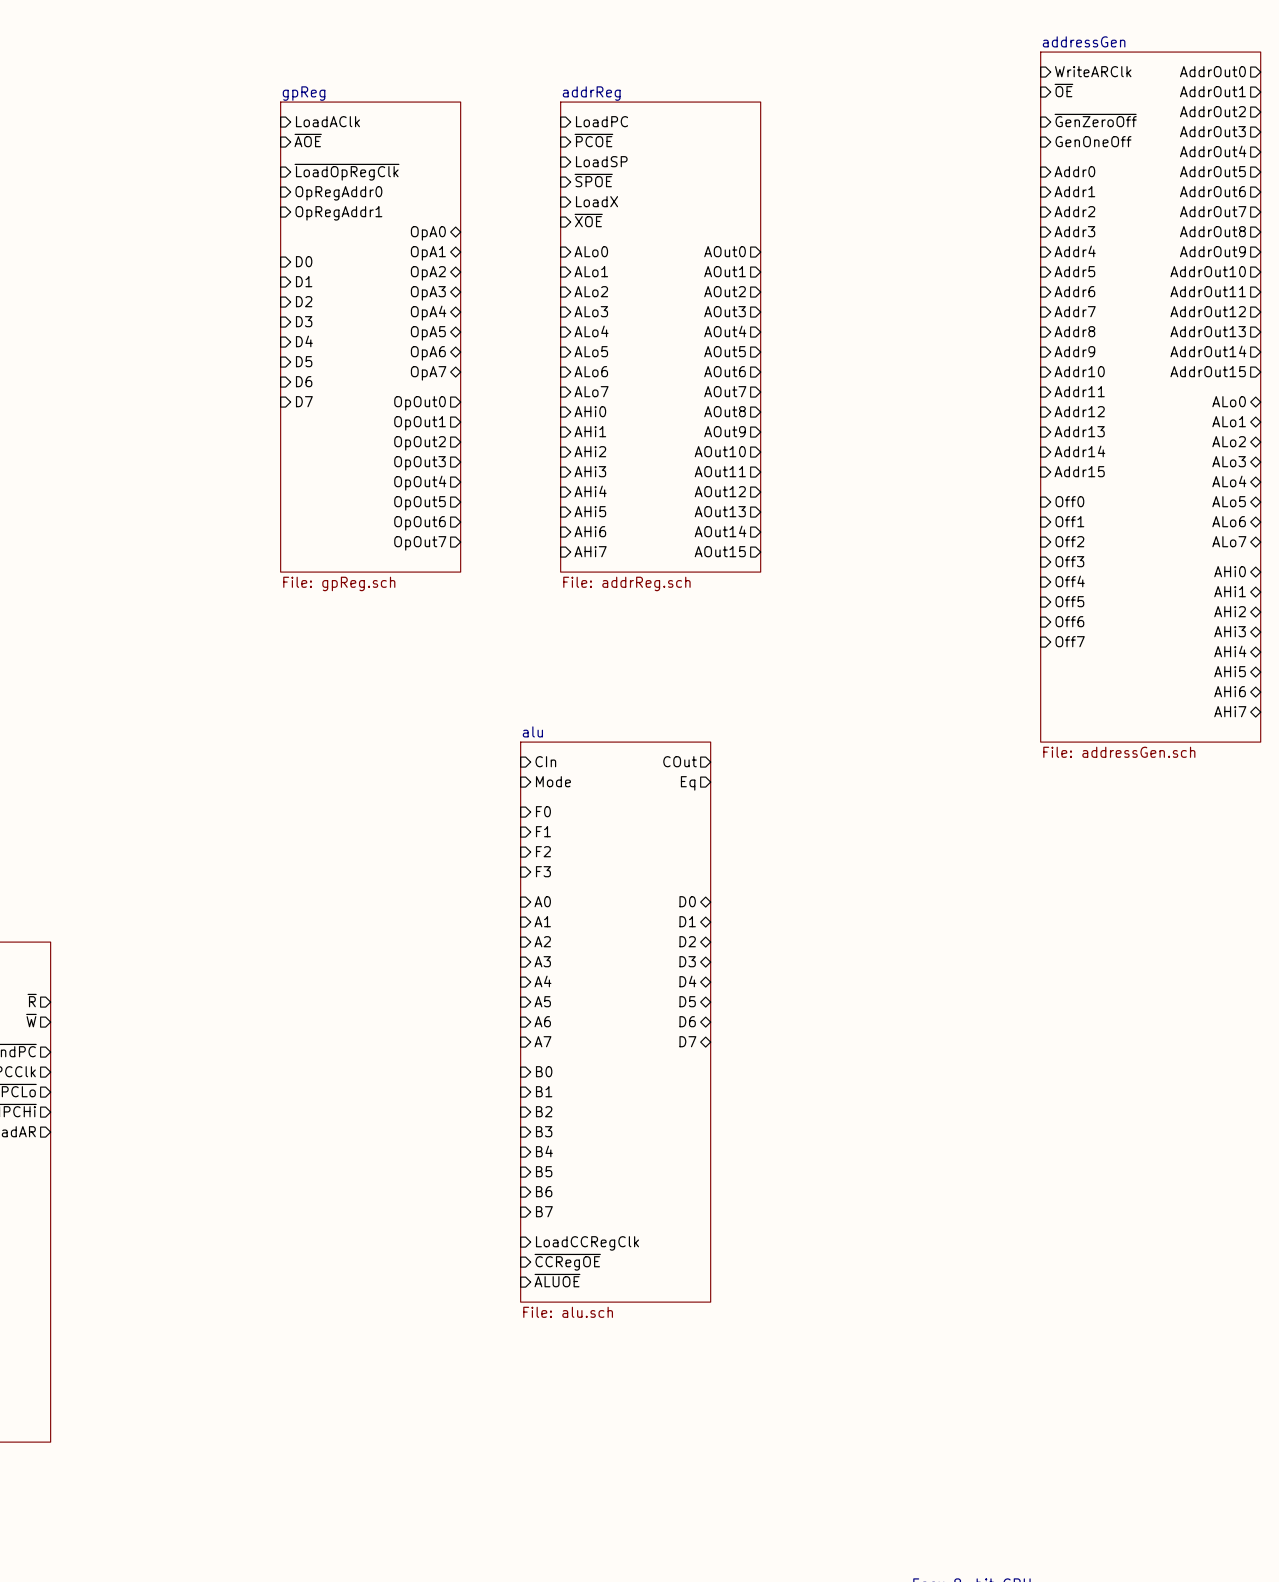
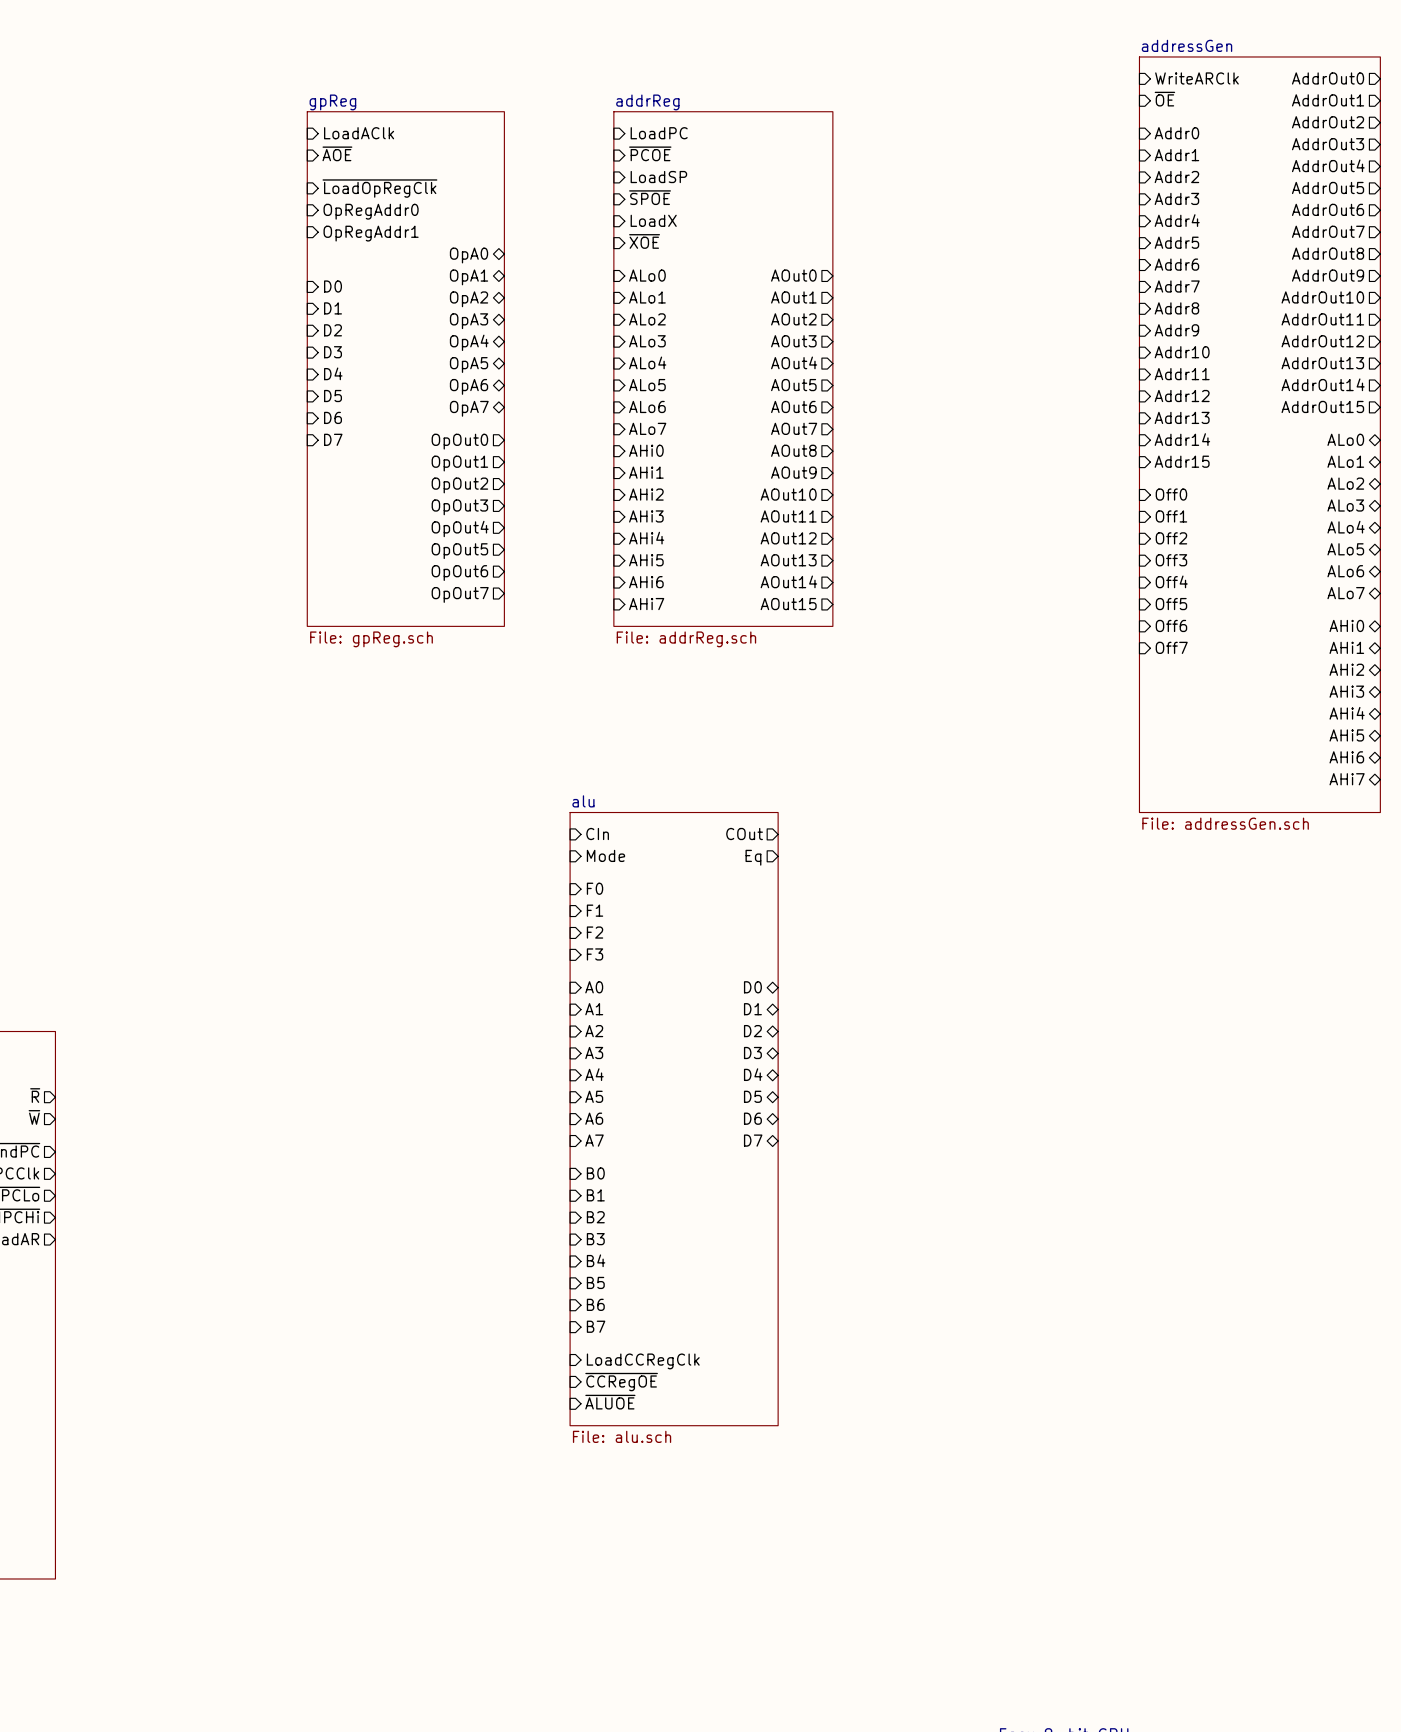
sheet pin: ~{GenZeroOff} (1095, 120) -> Addr0 (1176, 133)
sheet pin: GenOneOff (1093, 141) -> Addr1 (1176, 155)
sheet pin: Addr0 (1074, 171) -> none
sheet pin: Addr1 (1074, 191) -> none
sheet pin position: Addr2 (1074, 211) -> Addr2 (1176, 177)
sheet pin position: Addr3 (1074, 231) -> Addr3 (1176, 198)
sheet pin position: Addr4 (1075, 251) -> Addr4 (1177, 220)
sheet pin position: Addr5 (1074, 271) -> Addr5 (1176, 242)
sheet pin position: Addr6 (1074, 291) -> Addr6 (1176, 264)
sheet pin position: Addr7 (1075, 311) -> Addr7 (1177, 286)
sheet pin position: Addr8 (1074, 331) -> Addr8 (1176, 308)
sheet pin position: Addr9 (1074, 351) -> Addr9 (1176, 330)
sheet pin position: Addr10 (1079, 371) -> Addr10 (1182, 352)
sheet pin position: Addr11 (1079, 391) -> Addr11 (1182, 374)
sheet pin: none -> Addr14 (1182, 439)
sheet pin position: Addr12 (1079, 411) -> Addr12 (1182, 396)
sheet pin: none -> Addr15 (1182, 461)
sheet pin position: Addr13 (1079, 431) -> Addr13 (1182, 417)
sheet pin: Addr14 (1079, 451) -> Off0 (1171, 494)
sheet pin: Addr15 (1079, 471) -> Off1 (1171, 516)
sheet pin: Off0 (1069, 501) -> none
sheet pin: Off1 (1069, 521) -> none
sheet pin position: Off2 (1069, 541) -> Off2 (1171, 538)
sheet pin position: Off3 (1069, 561) -> Off3 (1171, 560)
sheet pin position: Off4 (1070, 581) -> Off4 (1171, 581)
sheet pin position: Off5 (1069, 601) -> Off5 (1171, 604)
sheet pin position: Off6 (1069, 621) -> Off6 (1171, 625)
sheet pin position: Off7 (1070, 641) -> Off7 (1171, 647)

